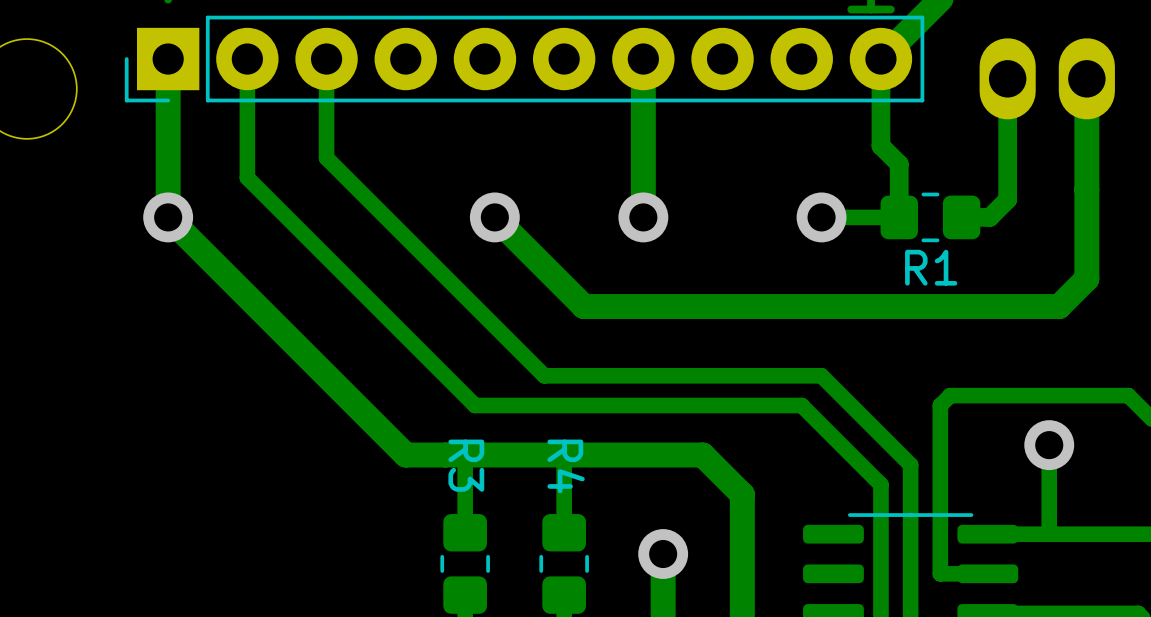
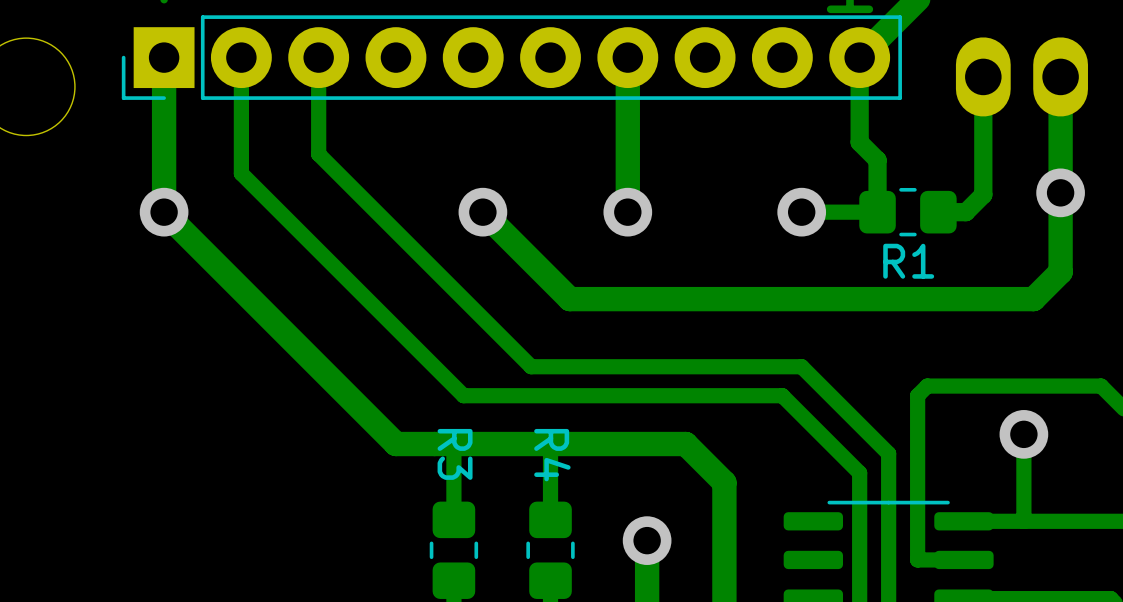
via: none -> (1060, 192)

